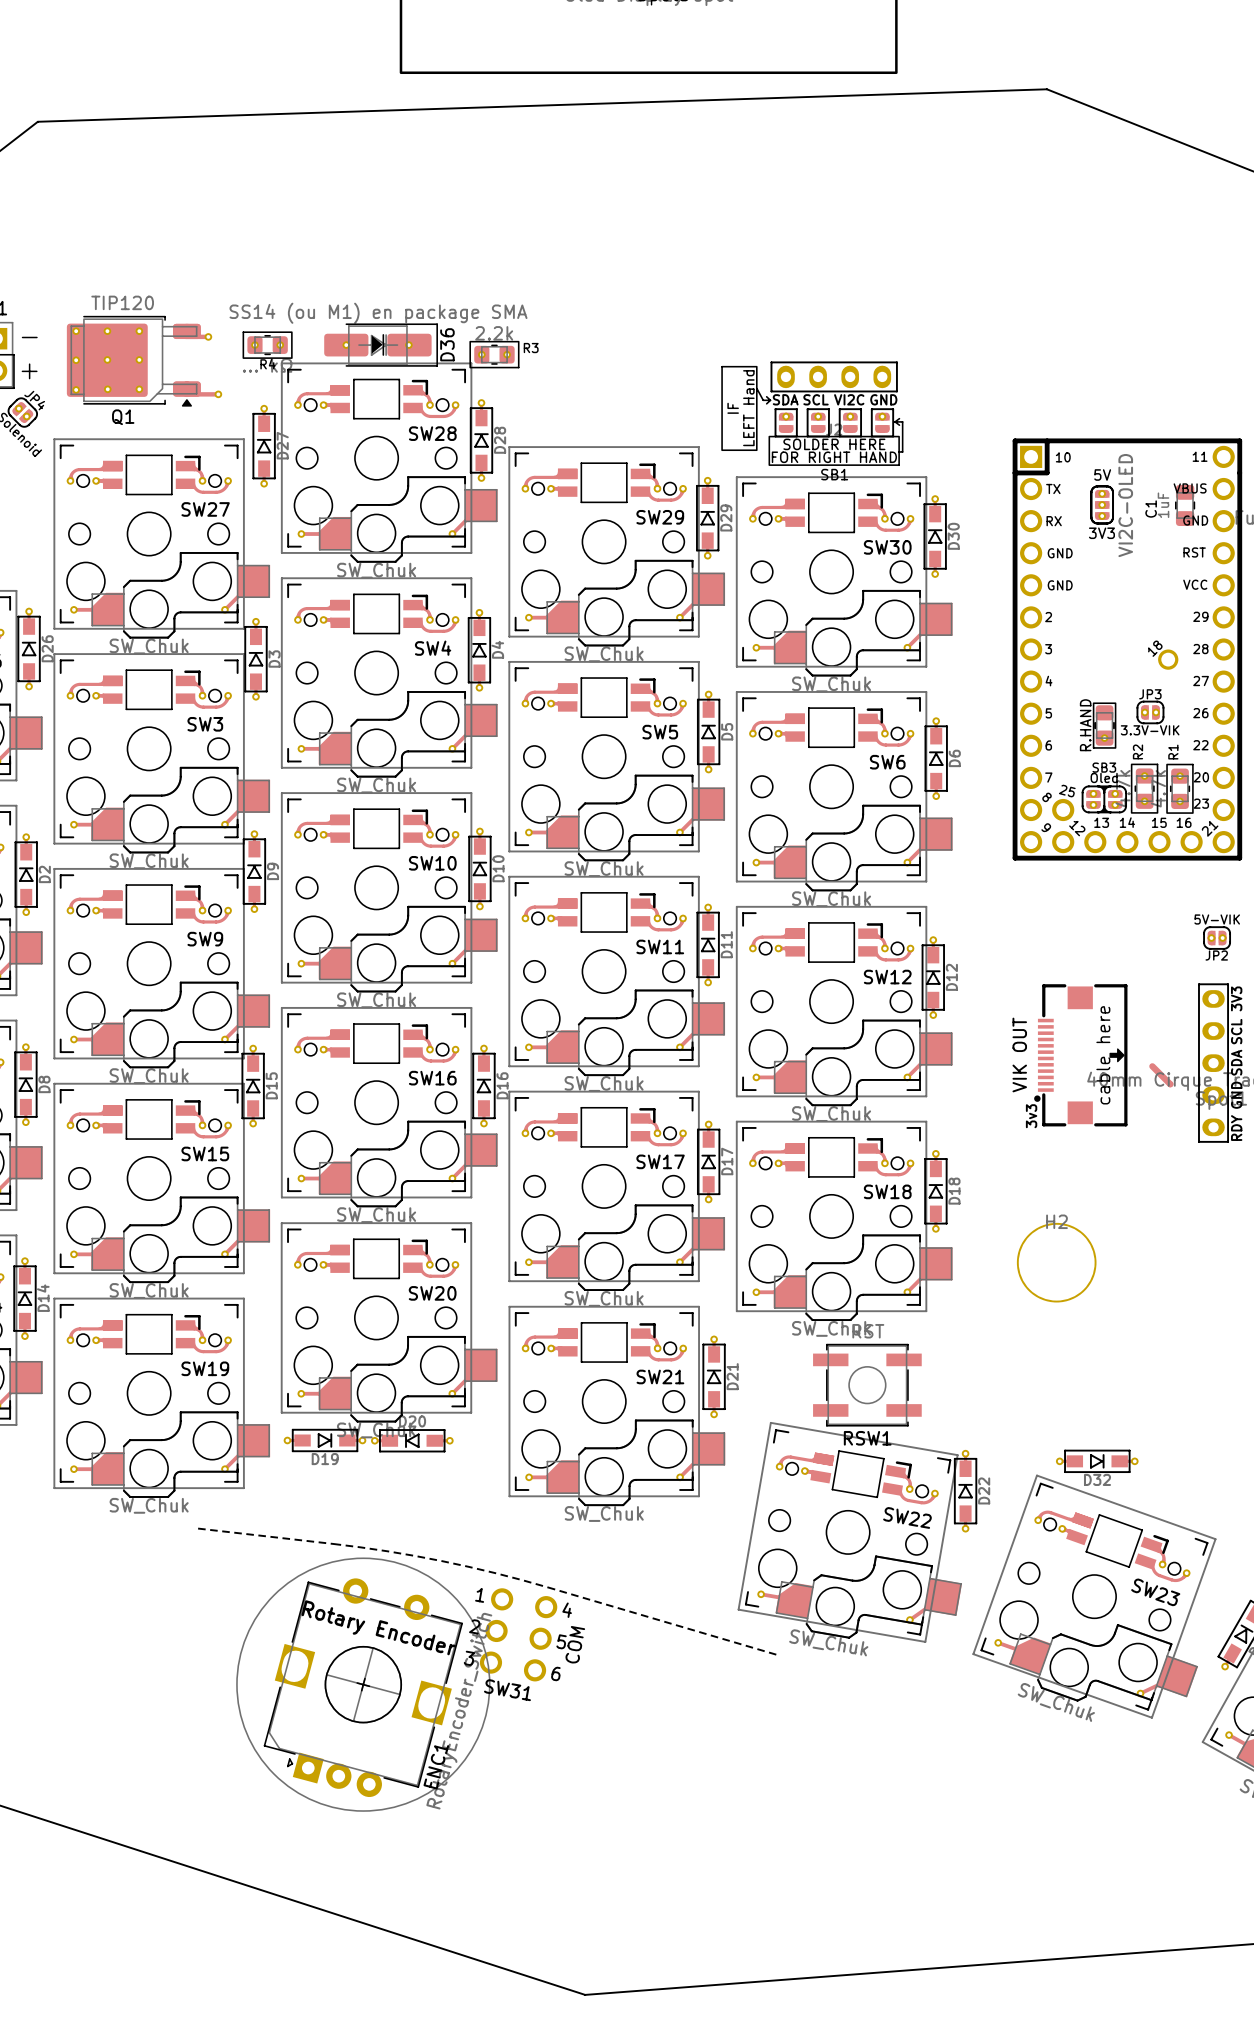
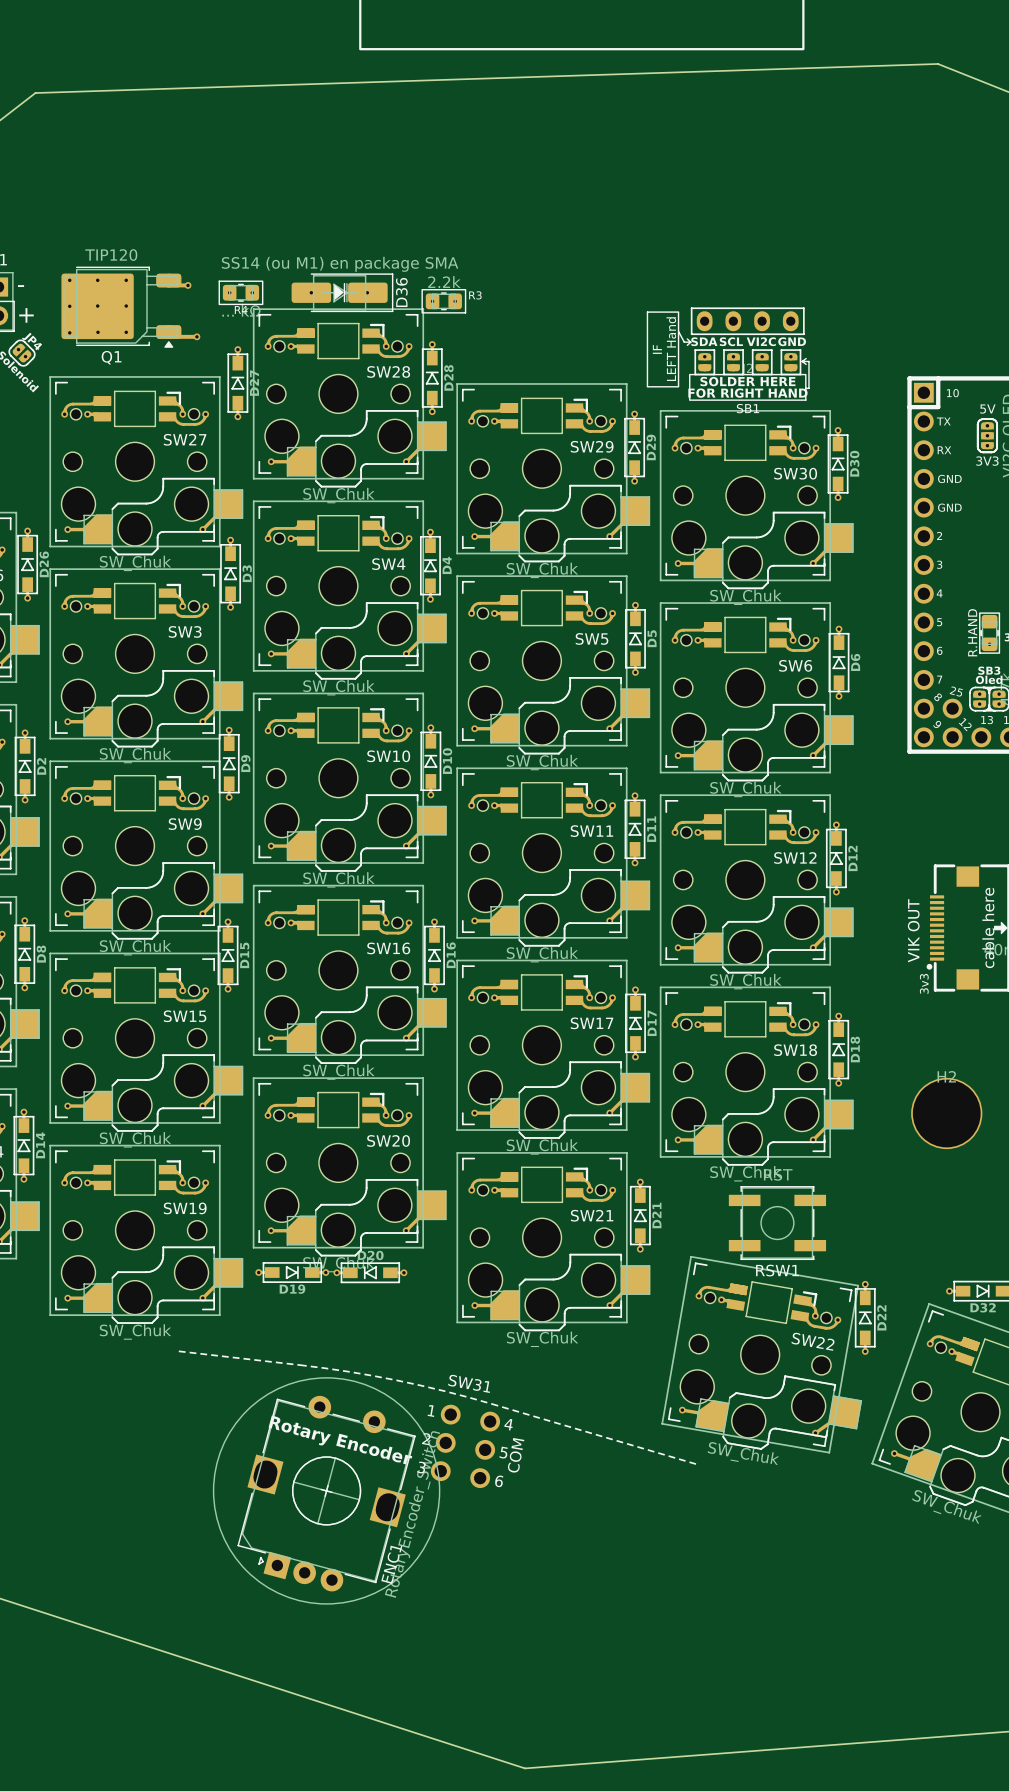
SW31 name position: SW31 (507, 1690) -> SW31 (469, 1383)

